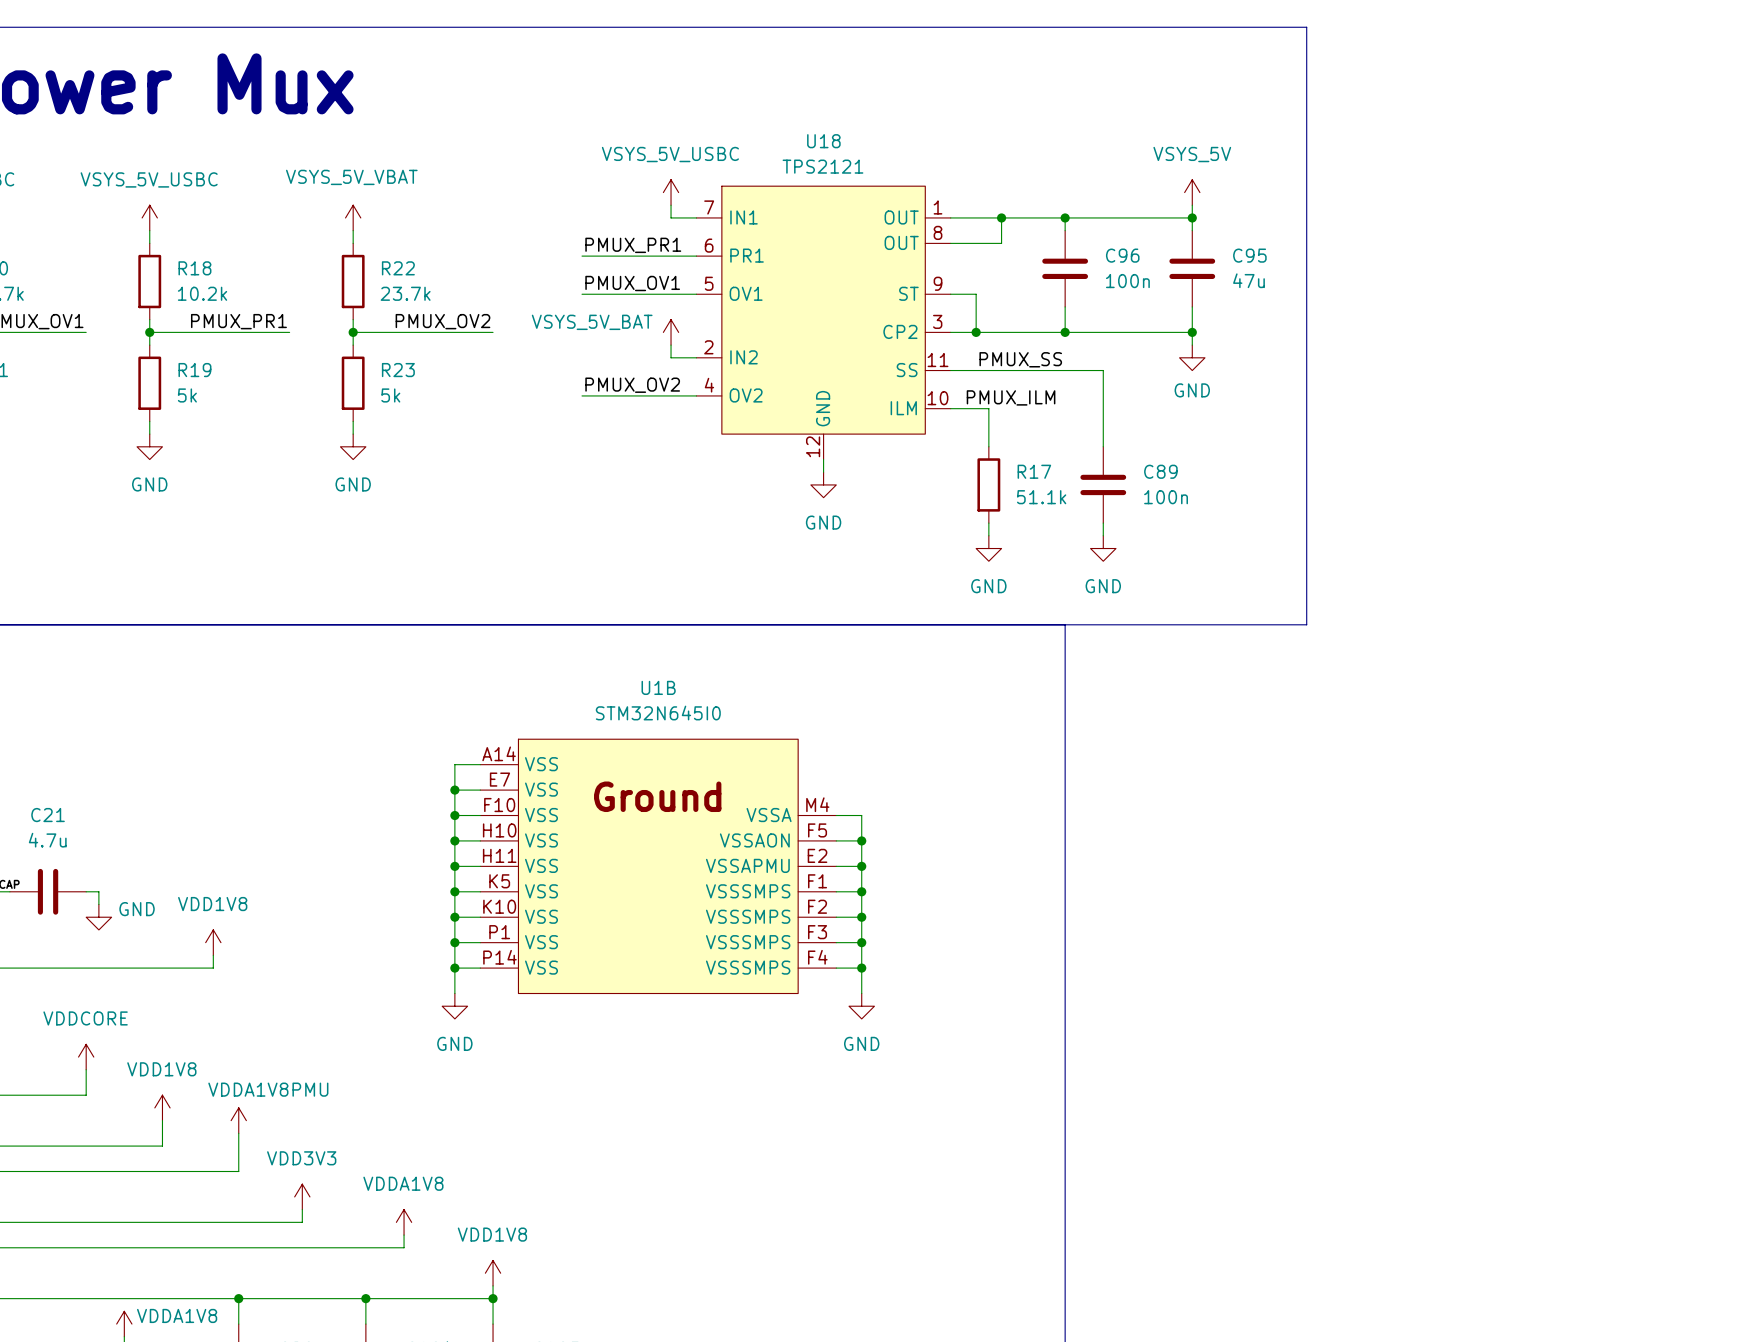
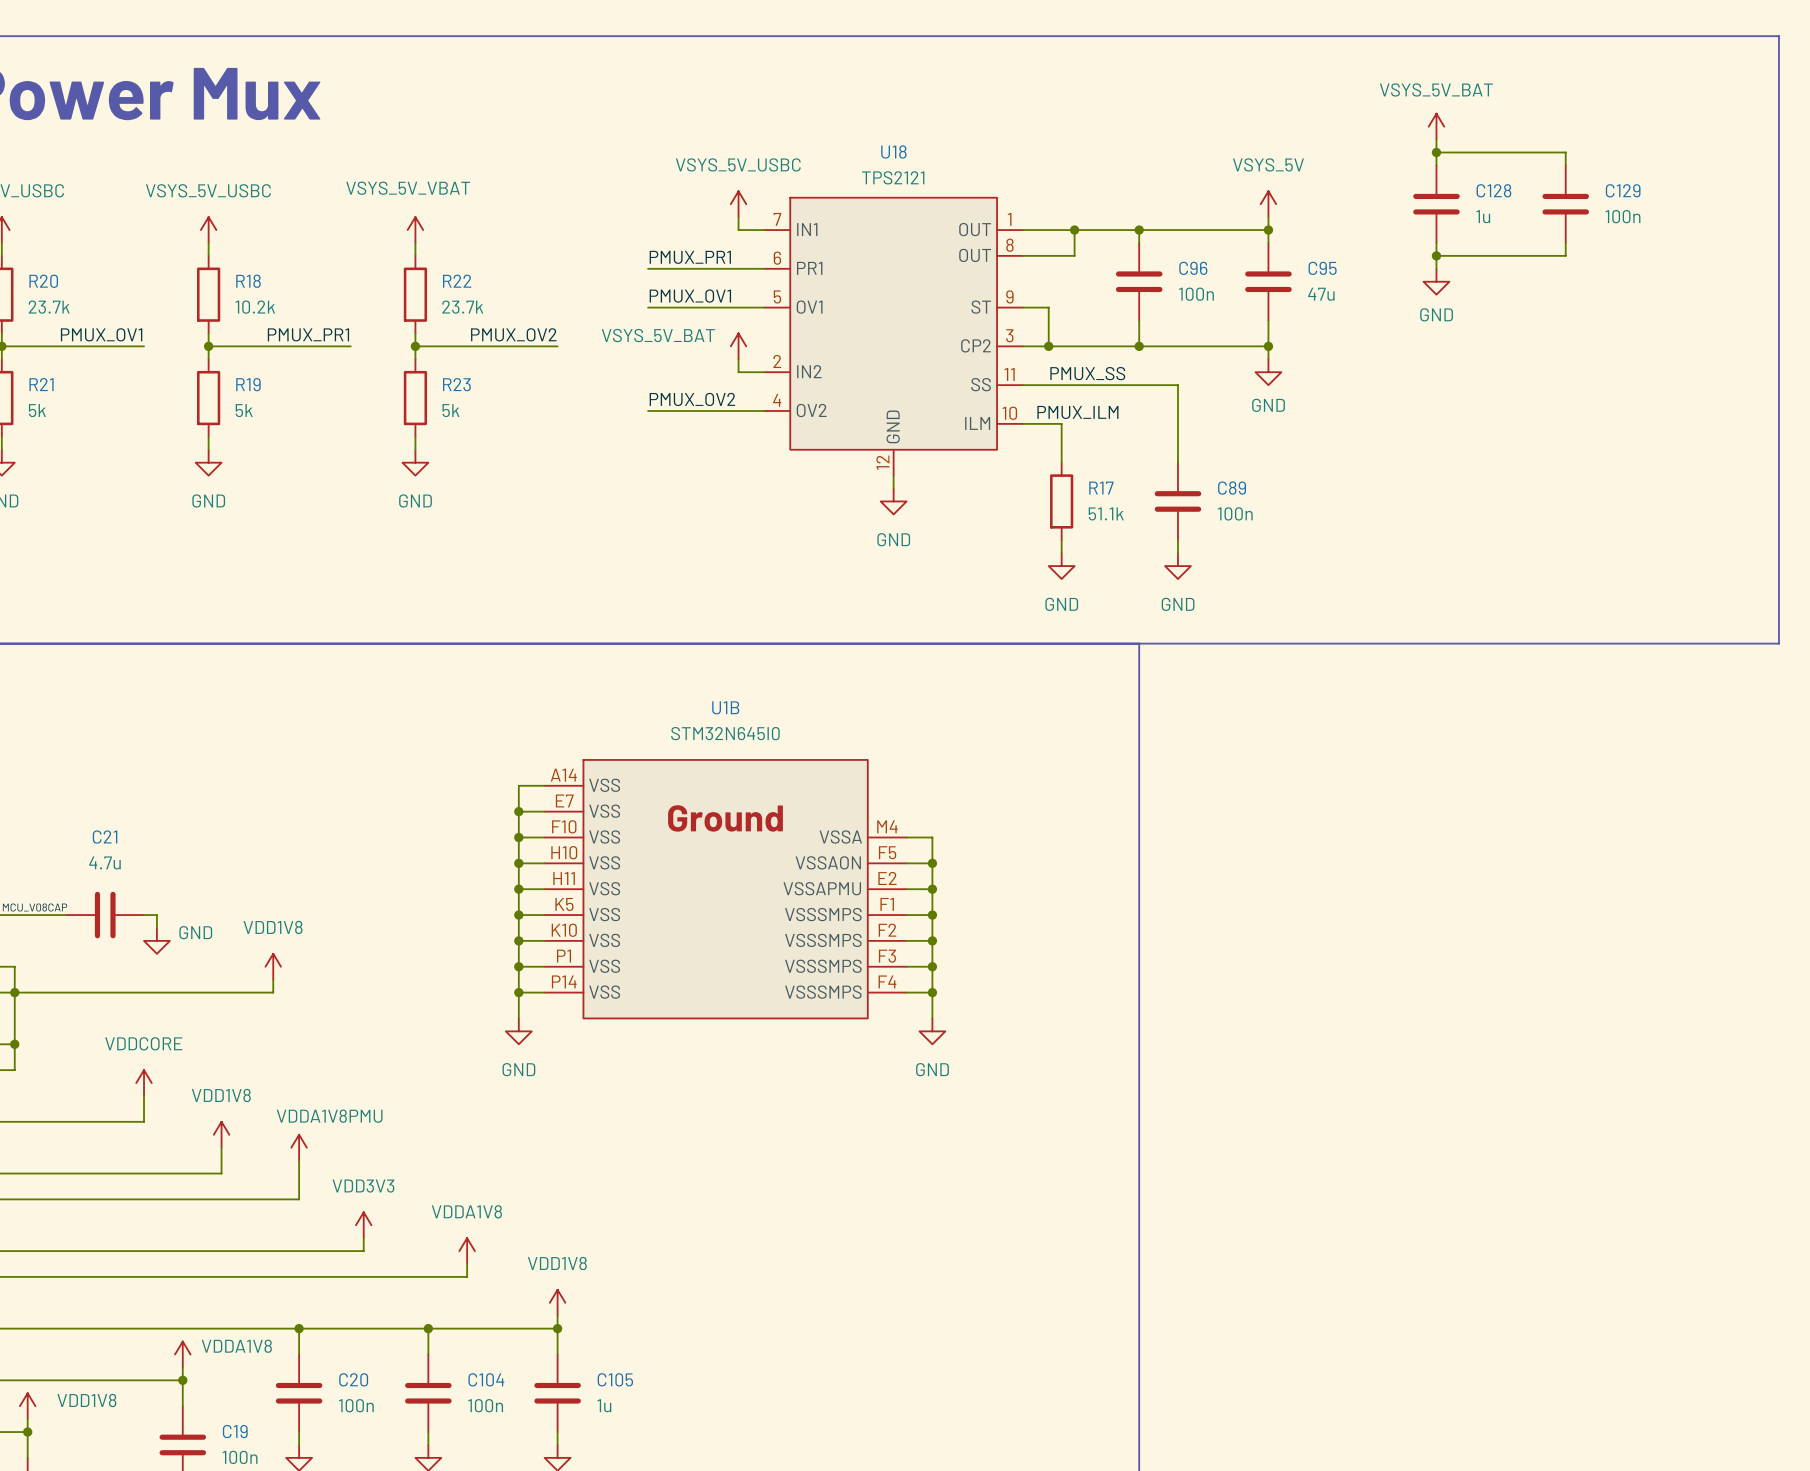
line: (1306, 27) (1306, 624) -> (1384, 36) (1778, 36) (1778, 643) (1384, 643)
power symbol: none -> VSYS_5V_BAT (1436, 126)
wire: none -> (1436, 139) (1436, 165)
wire: none -> (1436, 152) (1565, 152) (1565, 165)
junction: none -> (1436, 152)
C128: none -> 1u (1436, 204)
C129: none -> 100n (1565, 204)
wire: none -> (1436, 242) (1436, 268)
wire: none -> (1565, 242) (1565, 255) (1436, 255)
junction: none -> (1436, 255)
power symbol: none -> GND (1436, 281)

